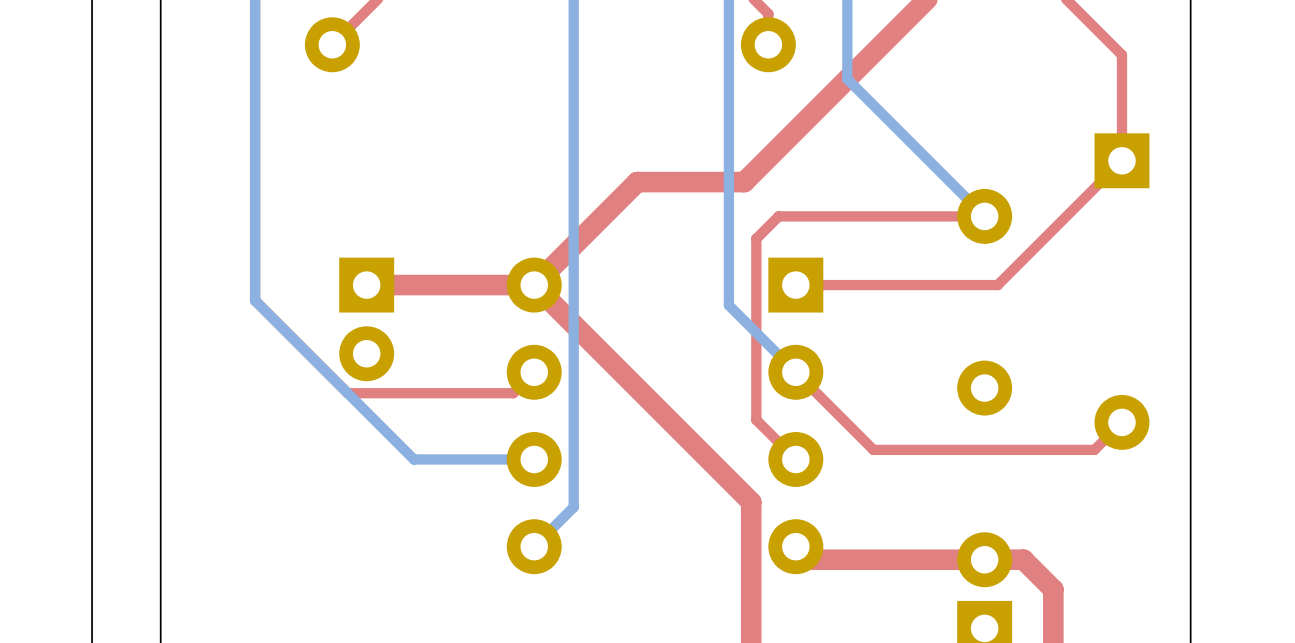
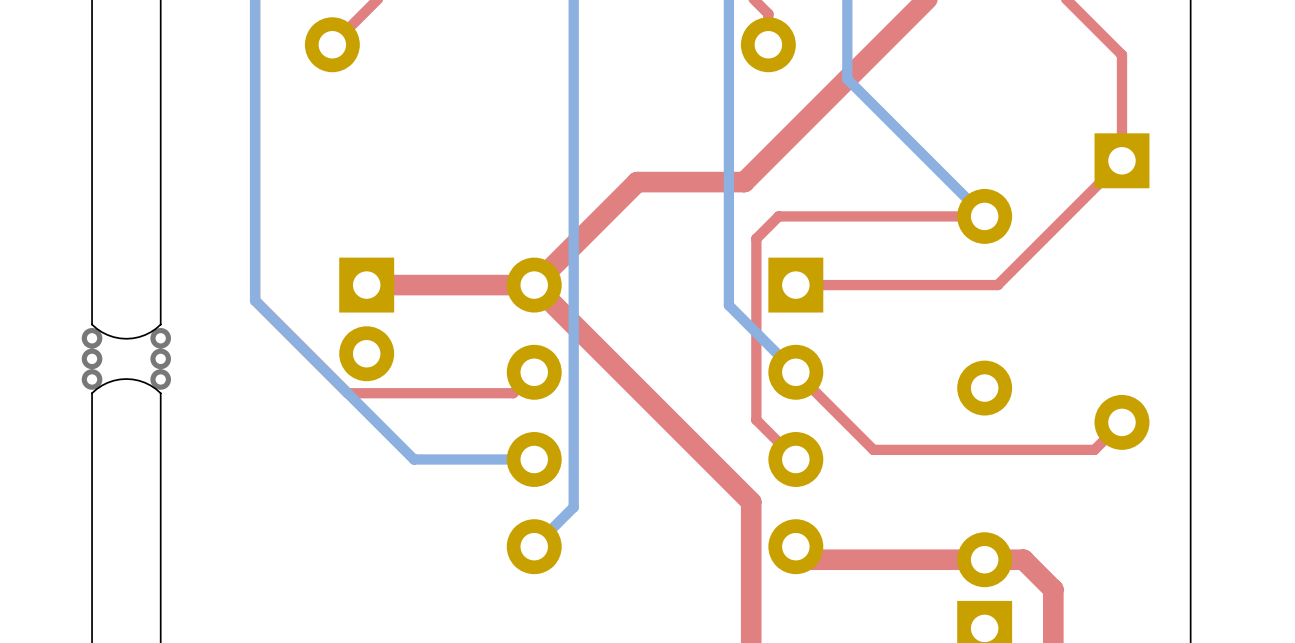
board edge: (92, 324) (92, 393) -> (160, 393) (144, 382) (126, 379) (107, 382) (92, 393)
board edge: (160, 324) (160, 393) -> (160, 324) (144, 335) (126, 338) (107, 335) (92, 324)
via: none -> (92, 338)
via: none -> (160, 338)
via: none -> (92, 358)
via: none -> (160, 358)
via: none -> (92, 379)
via: none -> (160, 379)

